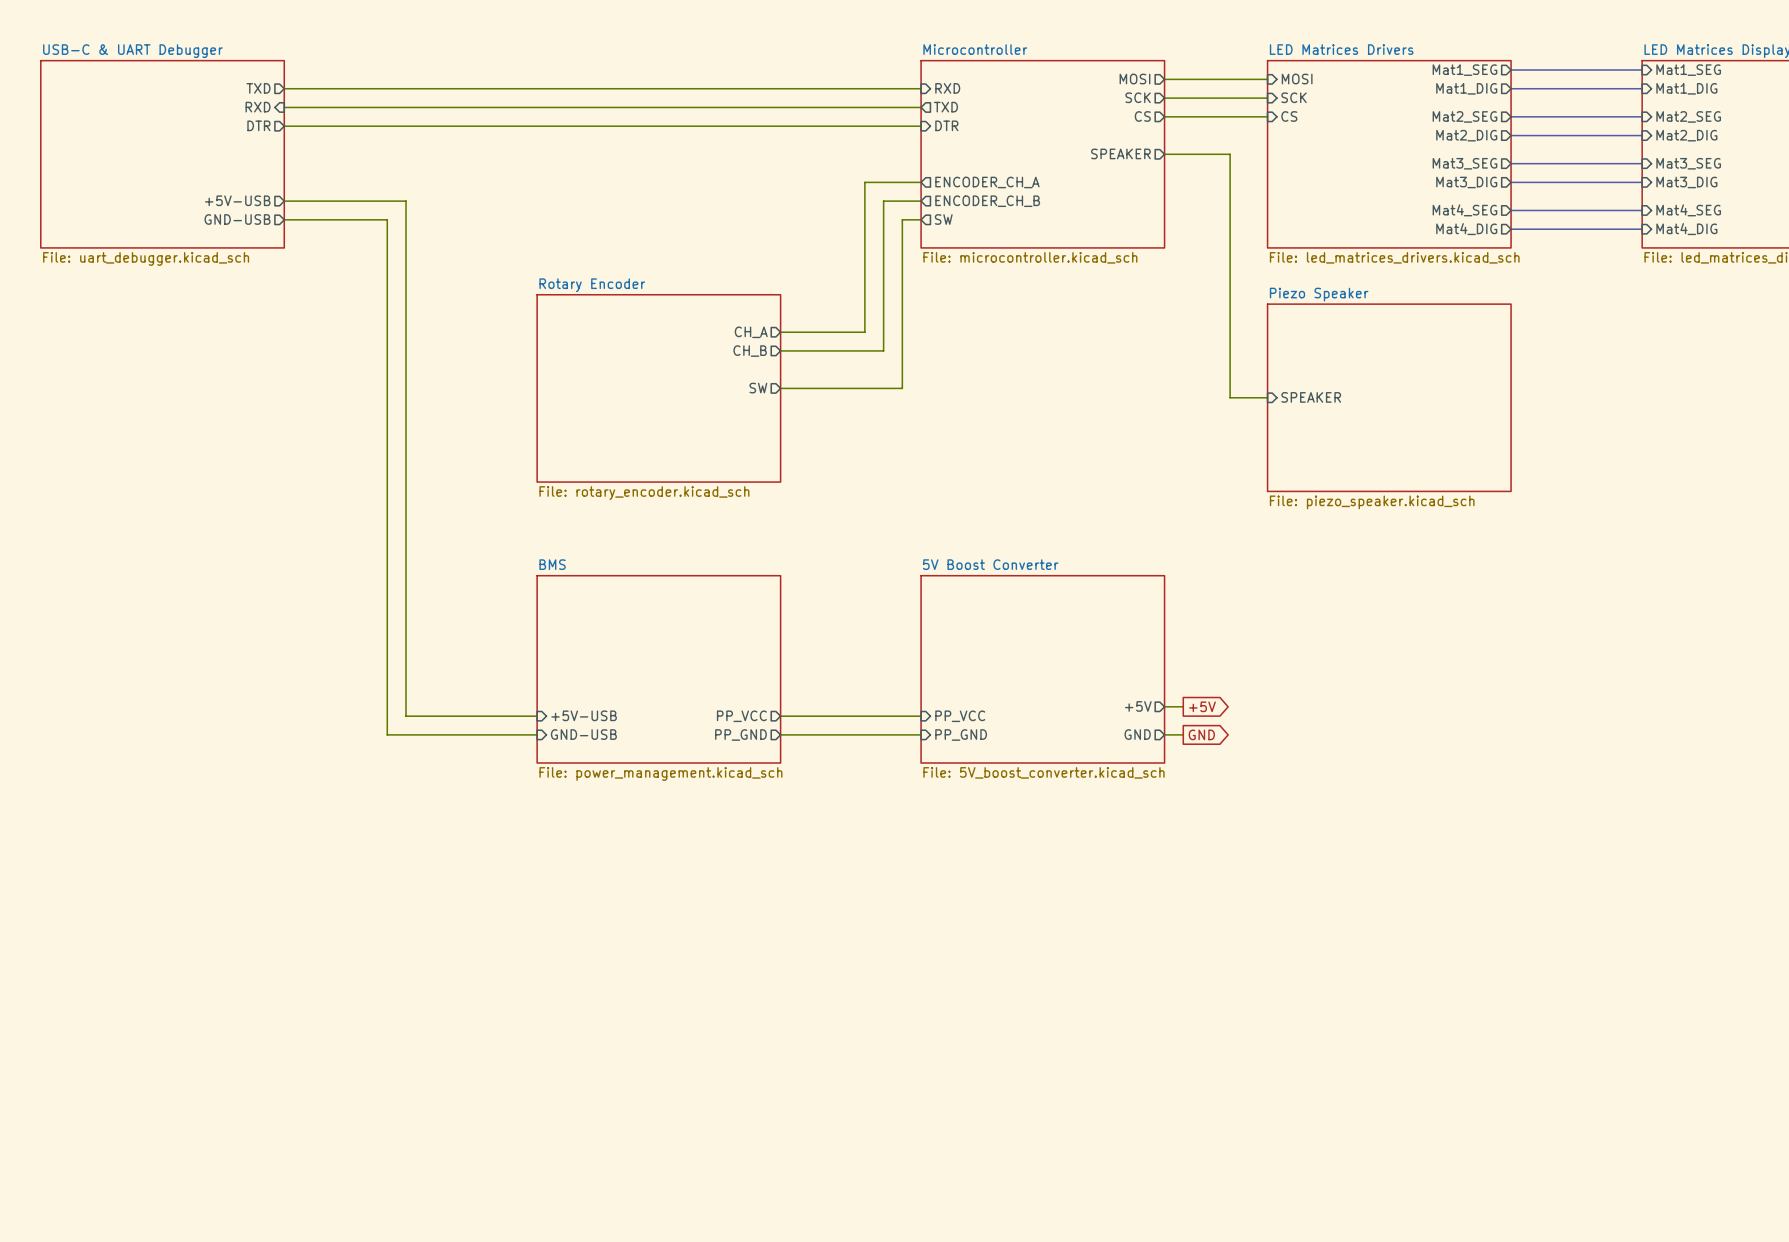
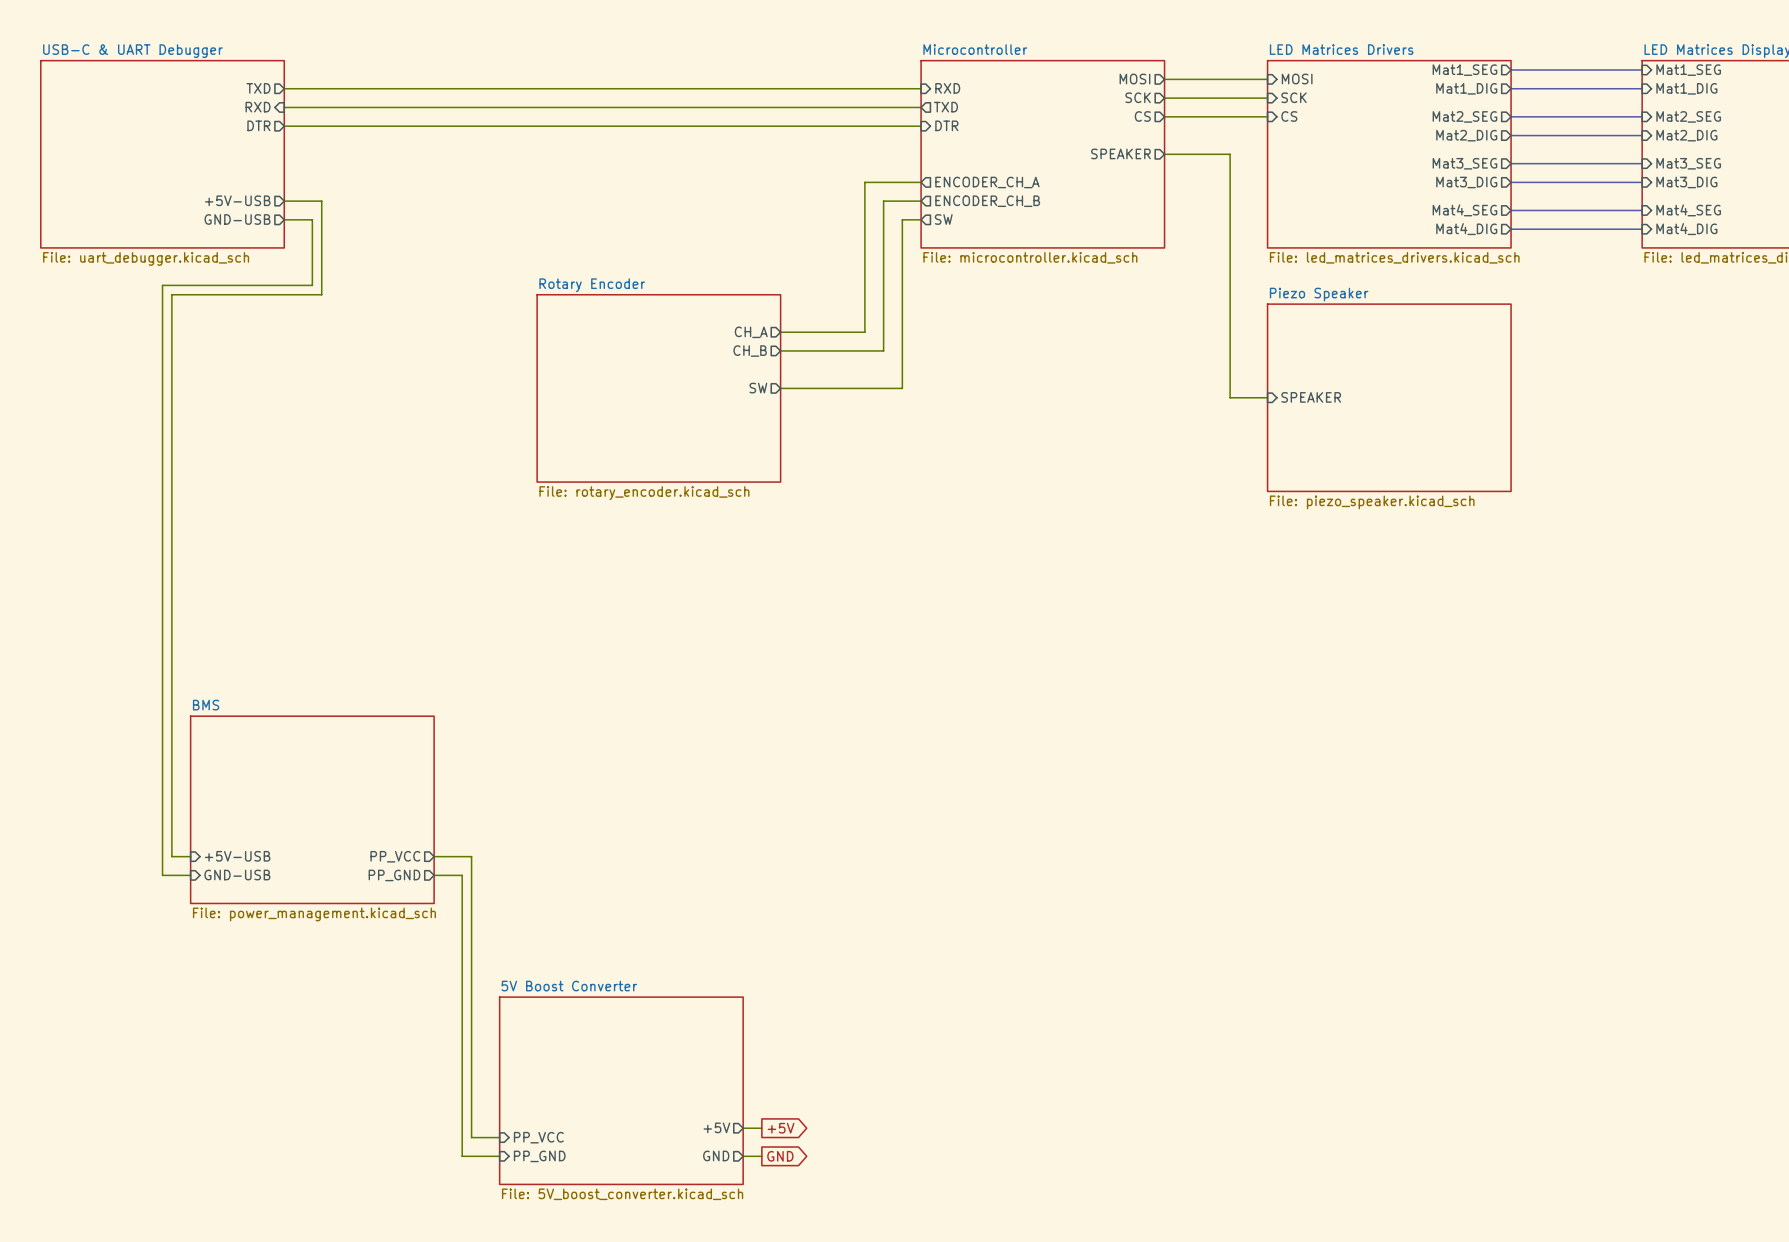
wire: (321, 201) (406, 201) (406, 716) (537, 716) -> (321, 201) (321, 294) (171, 294) (171, 856) (190, 856)
wire: (312, 219) (387, 219) (387, 734) (537, 734) -> (312, 219) (312, 285) (162, 285) (162, 875) (190, 875)
sheet BMS: File: power_management.kicad_sch (658, 669) -> none
sheet 5V Boost Converter position: (1042, 669) -> (621, 1090)
sheet pin: +5V (1138, 706) -> none
wire: (1164, 706) (1183, 706) -> none
global label: +5V (1202, 706) -> none
sheet pin: +5V-USB (584, 715) -> none
sheet pin: PP_VCC (741, 716) -> none
wire: (780, 716) (921, 716) -> none
sheet pin: PP_VCC (960, 716) -> none
sheet pin: GND-USB (583, 734) -> none
wire: (780, 734) (921, 734) -> none
sheet pin: GND (1137, 734) -> none
wire: (1164, 734) (1183, 734) -> none
global label: GND (1201, 734) -> none
sheet pin: PP_GND (740, 735) -> none
sheet pin: PP_GND (961, 735) -> none
sheet BMS: none -> File: power_management.kicad_sch (312, 809)
sheet pin: none -> +5V-USB (237, 856)
sheet pin: none -> PP_VCC (395, 856)
wire: none -> (434, 856) (471, 856) (471, 1137) (499, 1137)
sheet pin: none -> GND-USB (237, 875)
sheet pin: none -> PP_GND (394, 875)
wire: none -> (434, 875) (462, 875) (462, 1156) (499, 1156)
sheet pin: none -> +5V (716, 1127)
wire: none -> (743, 1128) (761, 1128)
global label: none -> +5V (781, 1128)
sheet pin: none -> PP_VCC (538, 1137)
sheet pin: none -> GND (716, 1155)
sheet pin: none -> PP_GND (539, 1156)
wire: none -> (743, 1156) (761, 1156)
global label: none -> GND (780, 1156)

